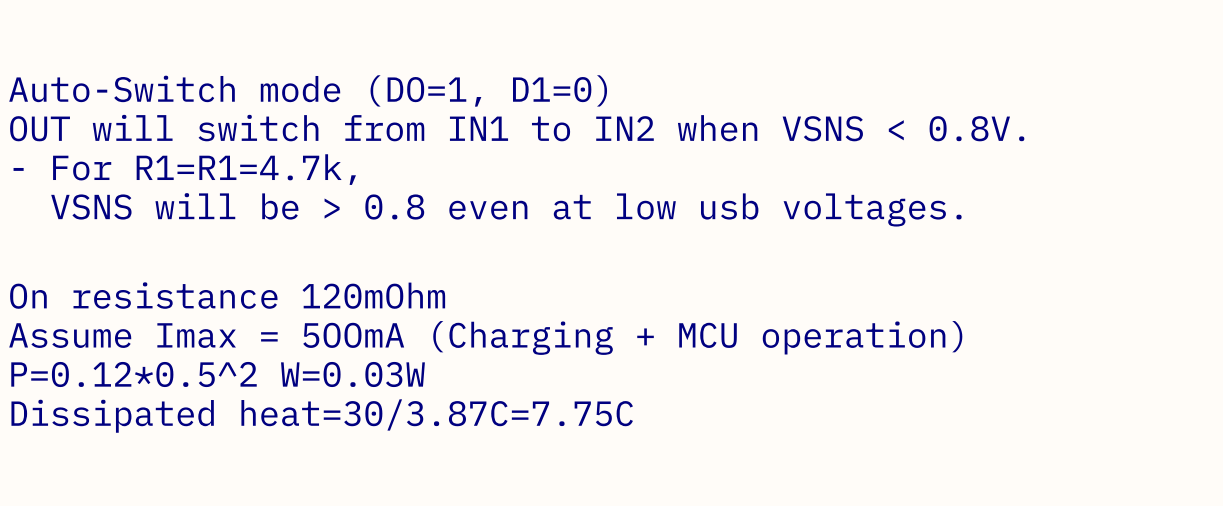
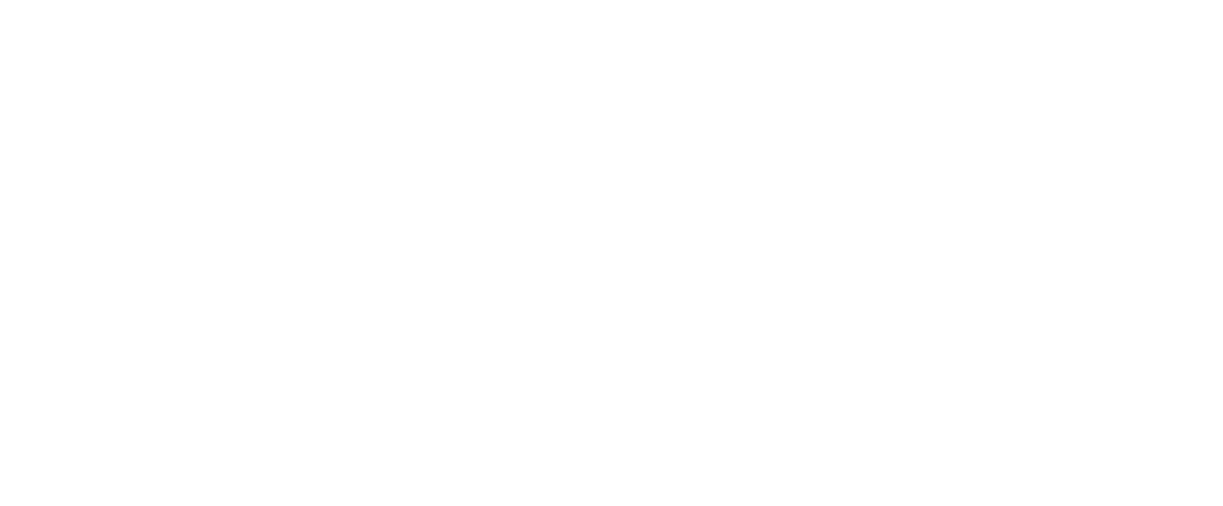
text: Auto-Switch mode (DO=1, D1=0) (308, 90) -> none
text: OUT will switch from IN1 to IN2 when VSNS < 0.8V. (517, 128) -> none
text: - For R1=R1=4.7k, (184, 169) -> none
text: VSNS will be > 0.8 even at low usb voltages. (506, 209) -> none
text: On resistance 120mOhm (227, 295) -> none
text: Assume Imax = 5OOmA (Charging + MCU operation) (485, 337) -> none
text: P=0.12*0.5^2 W=0.03W (218, 374) -> none
text: Dissipated heat=30/3.87C=7.75C (322, 416) -> none

